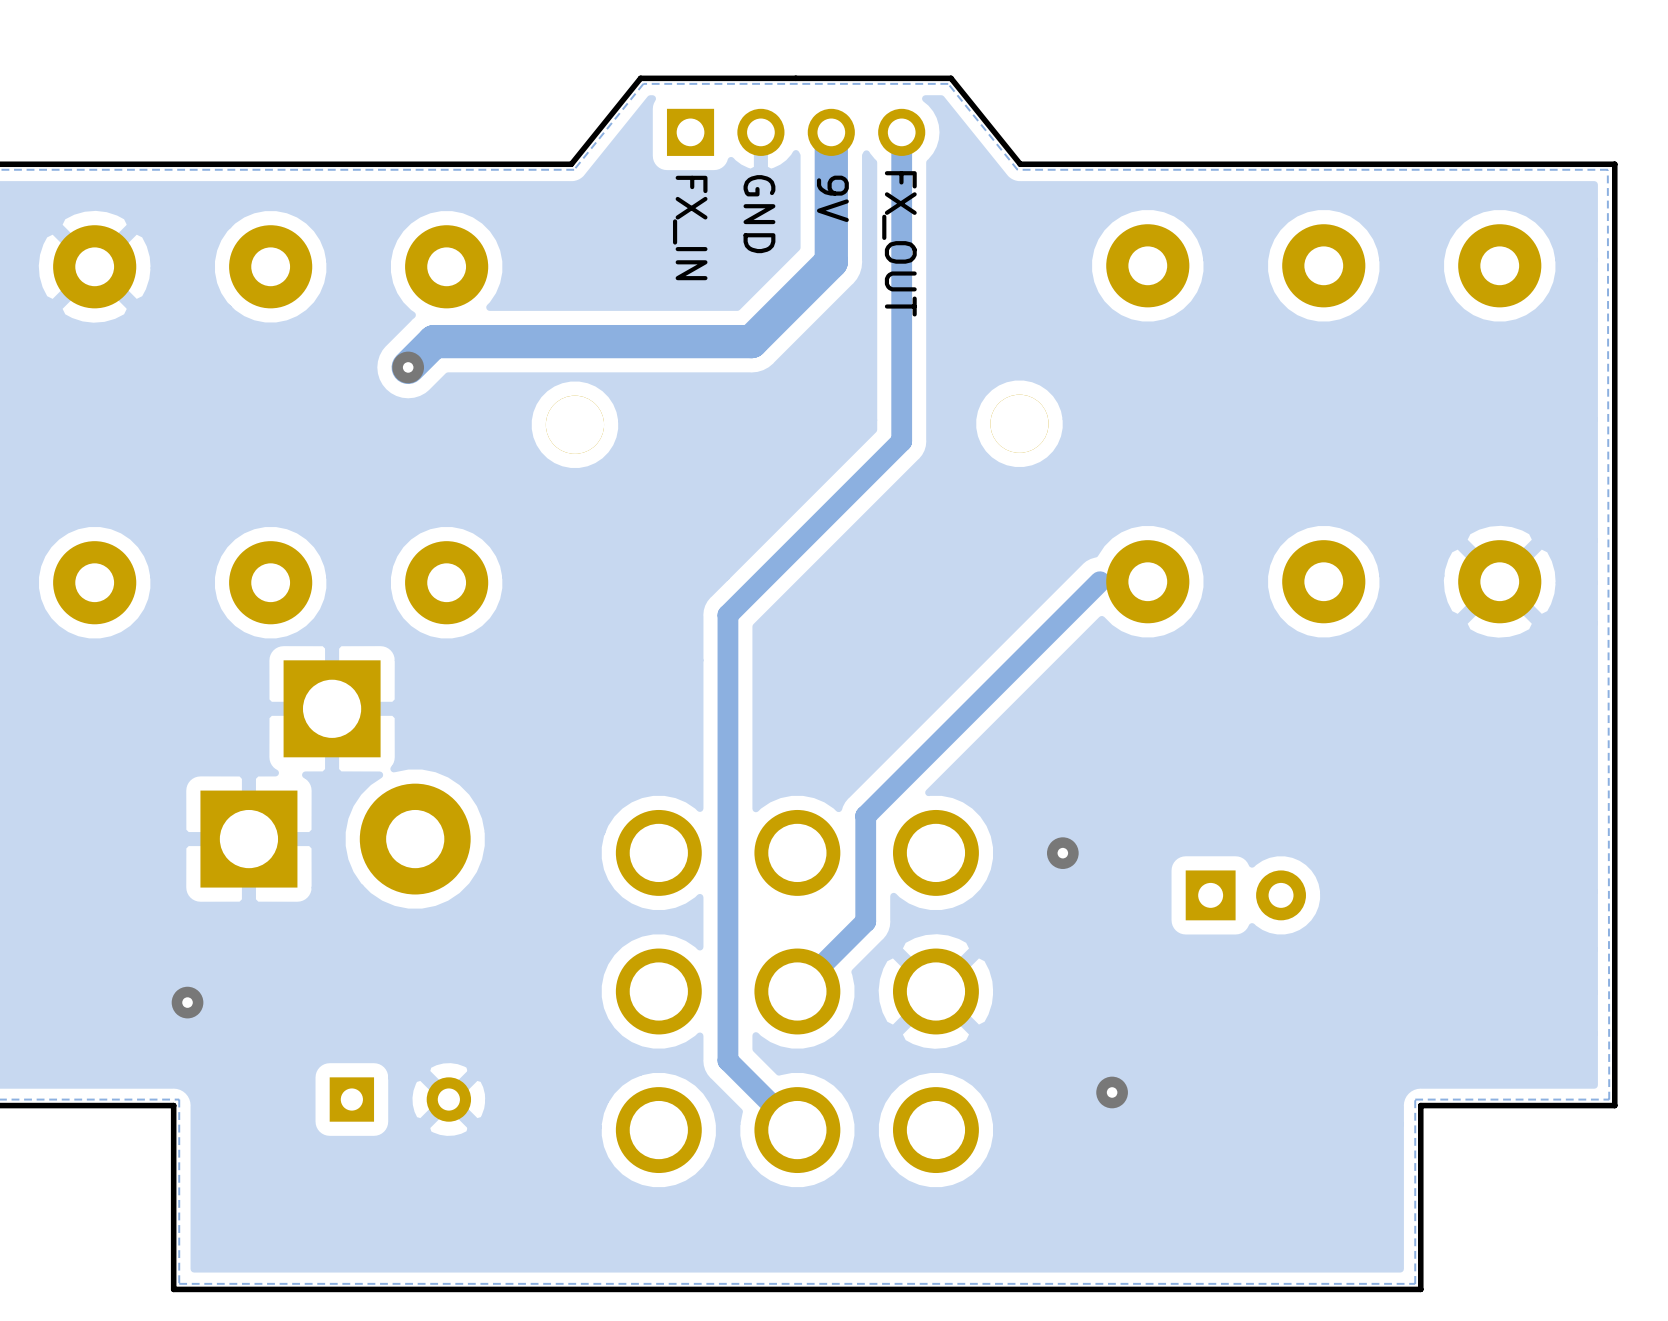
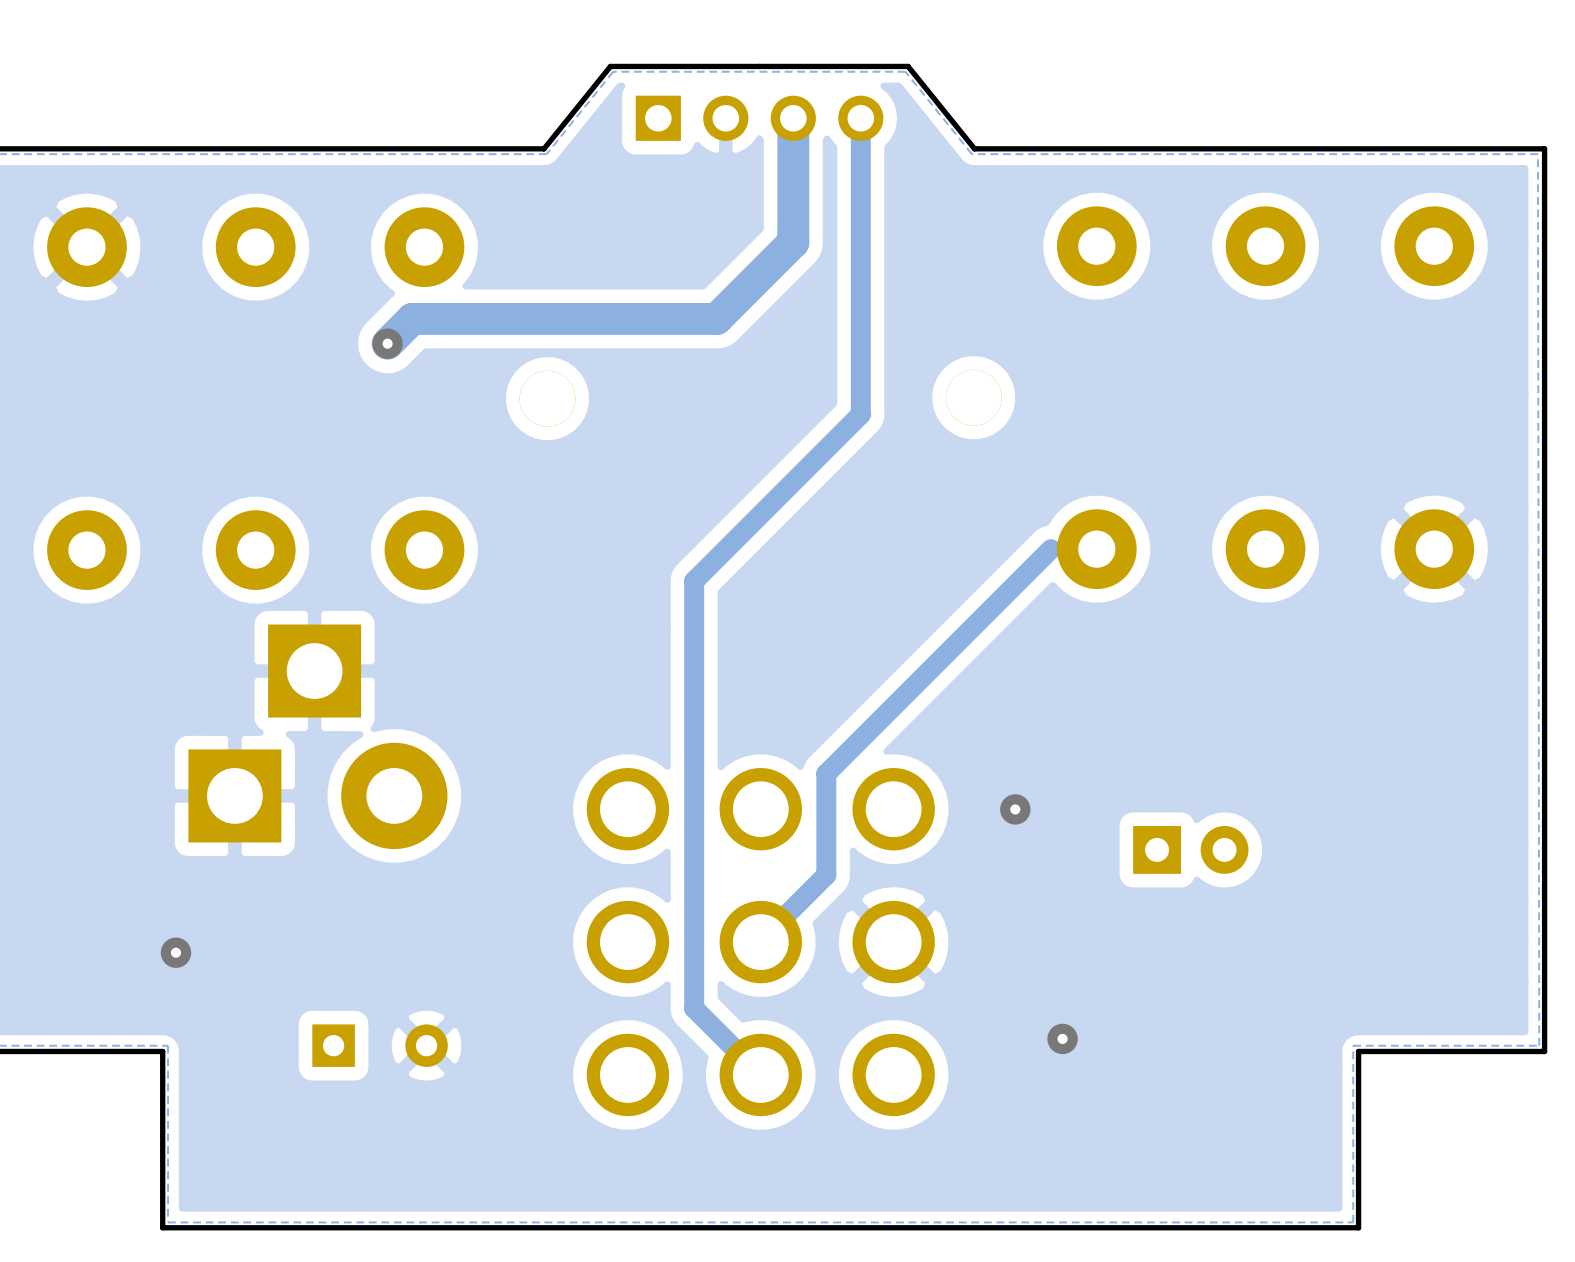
text: 9V (832, 198) -> none
text: GND (759, 214) -> none
text: FX_IN (690, 227) -> none
text: FX_OUT (899, 243) -> none

